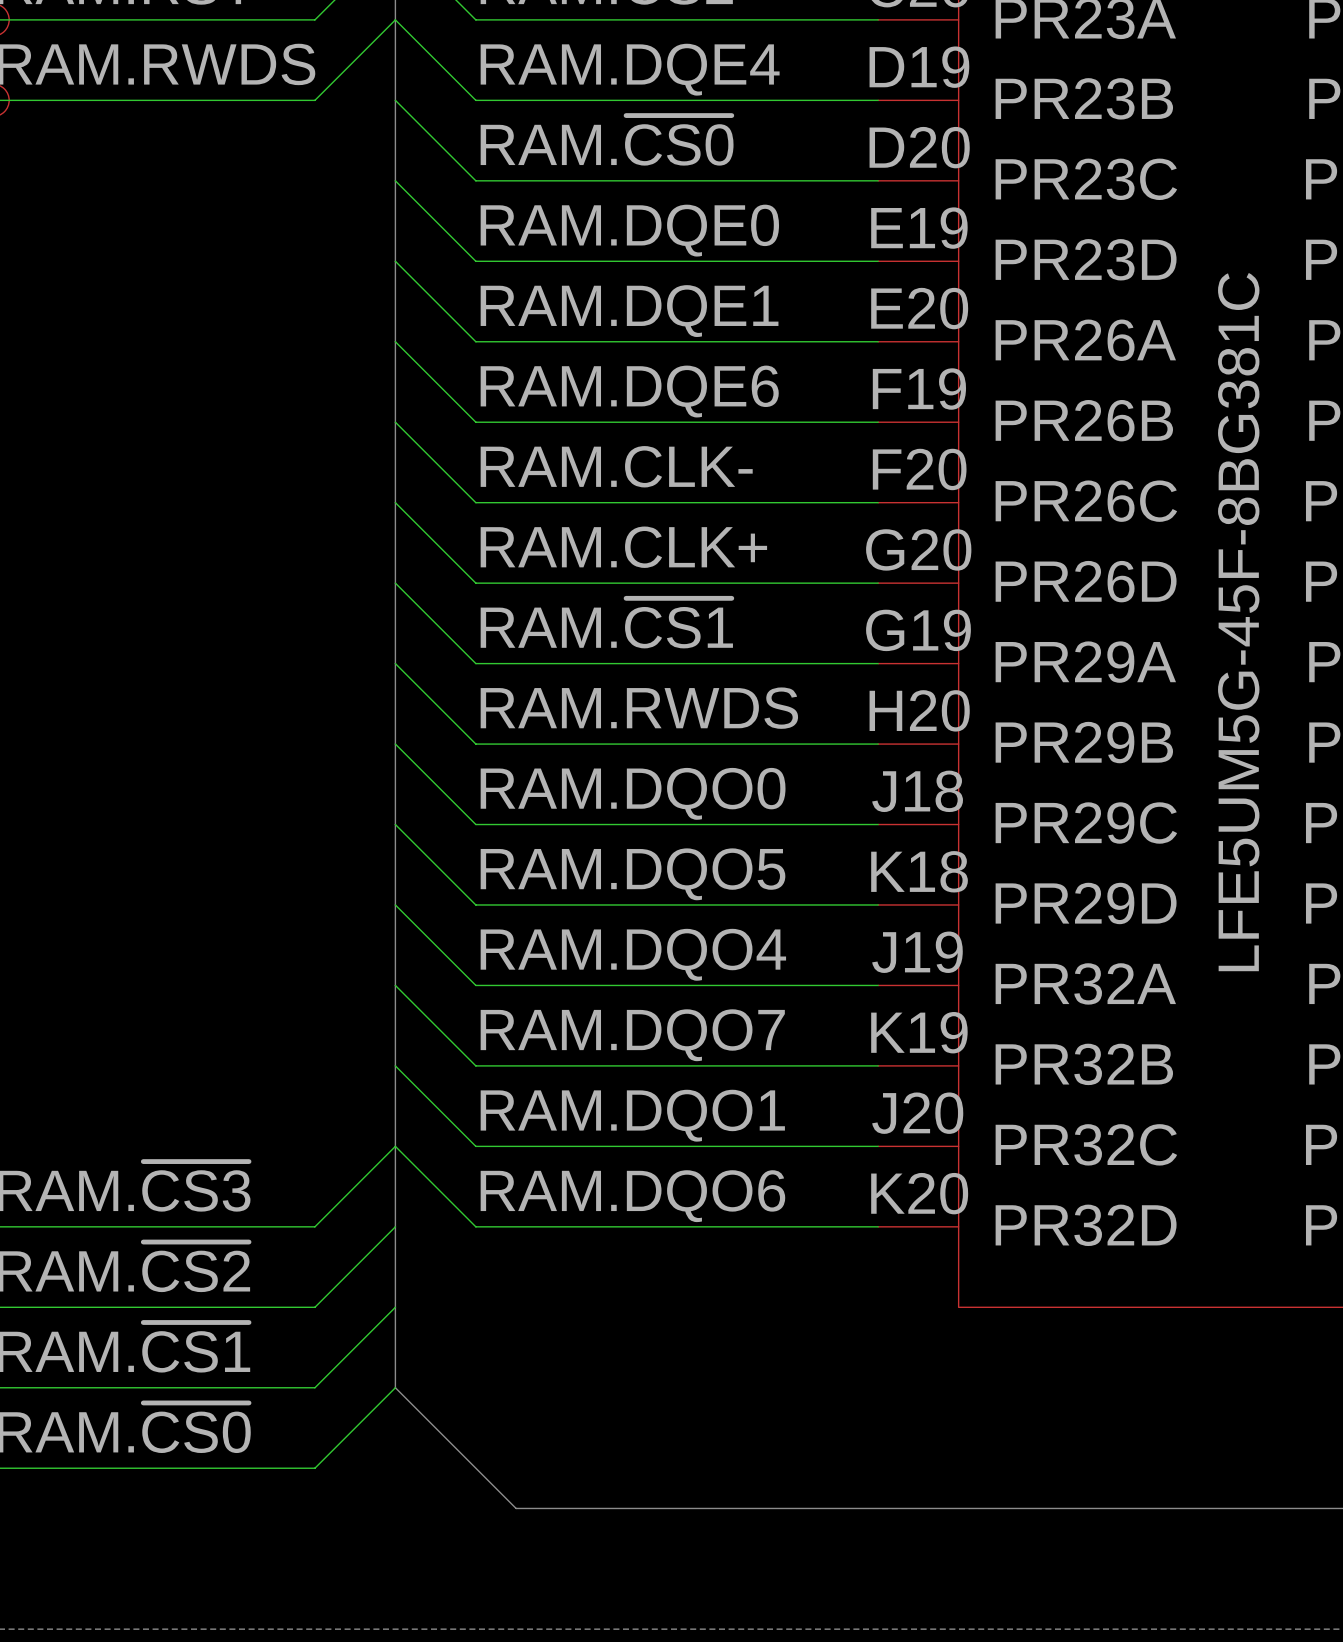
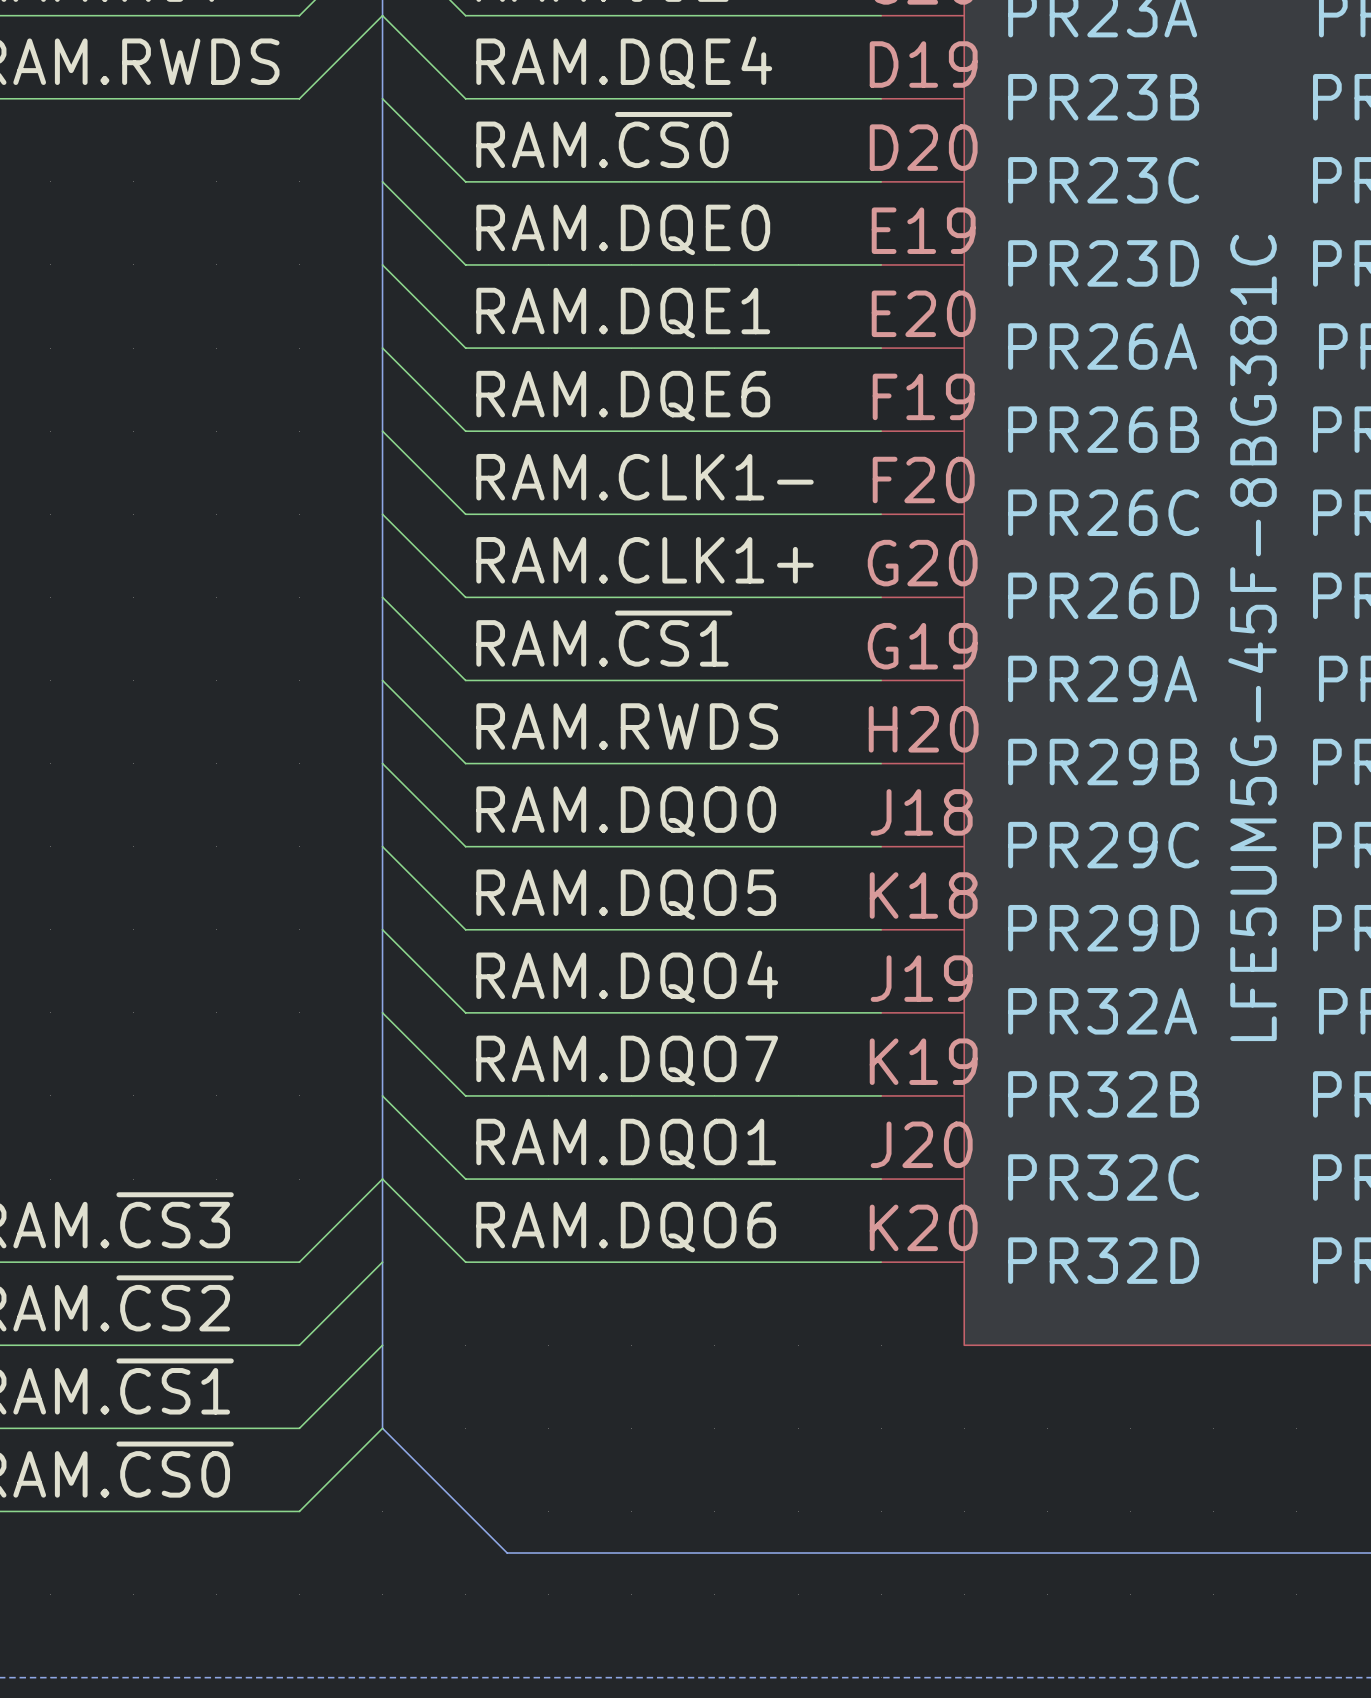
label: RAM.CLK- (616, 466) -> RAM.CLK1- (645, 477)
label: RAM.CLK+ (623, 547) -> RAM.CLK1+ (645, 560)

